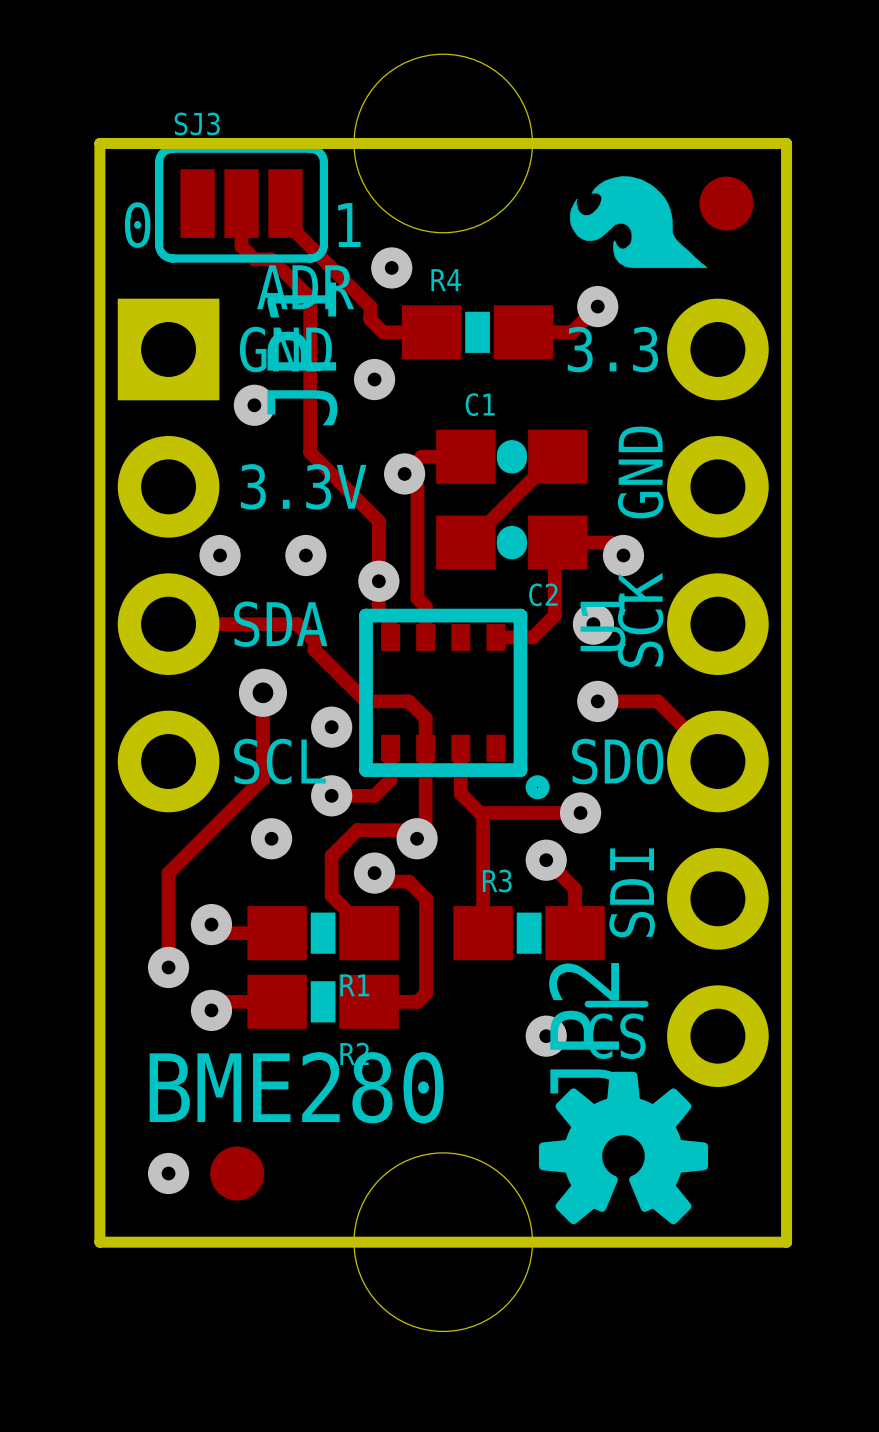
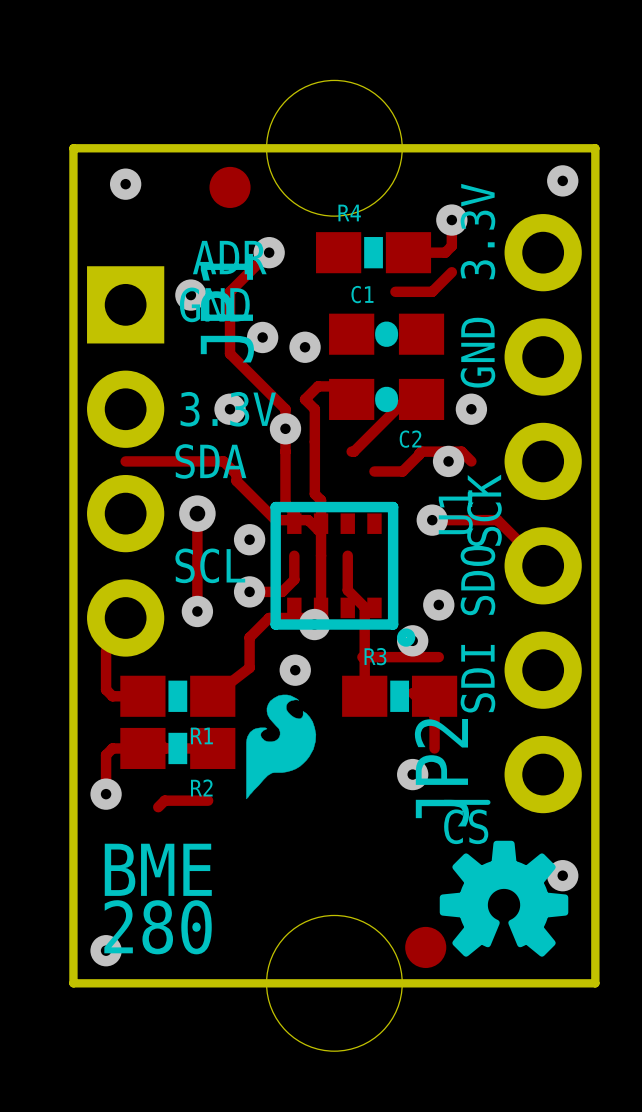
drawing: [569, 176, 708, 269] -> none
via: none -> (562, 180)
via: none -> (125, 184)
track: (241, 203) (241, 246) (254, 259) (271, 259) (310, 297) (310, 452) (378, 521) -> (269, 252) (230, 291) (230, 353) (285, 409) (285, 435)
SJ3: (241, 203) -> none
track: (285, 203) (285, 221) (370, 306) (370, 319) (383, 332) (431, 332) -> none
part position: (726, 203) -> (230, 187)
text: 0 (137, 225) -> none
text: 1 (349, 225) -> none
track: none -> (451, 220) (451, 246) (445, 252) (408, 252)
via position: (391, 267) -> (269, 252)
via position: (597, 306) -> (451, 220)
R4 position: (477, 332) -> (373, 252)
via: none -> (190, 295)
text: 3.3 (612, 349) -> 3.3V (477, 231)
via: (374, 379) -> none
via: none -> (262, 337)
via: (254, 405) -> none
via: none -> (305, 347)
C1 position: (511, 456) -> (386, 334)
text position: GND (640, 472) -> GND (477, 352)
via position: (404, 473) -> (285, 428)
via: none -> (230, 409)
via: none -> (471, 409)
C2 position: (511, 542) -> (386, 399)
track: (554, 546) (554, 615) (532, 637) (495, 637) -> (419, 454) (402, 471) (374, 471)
via: (220, 555) -> none
via: (305, 555) -> none
via position: (623, 555) -> (448, 461)
via: (378, 581) -> none
track: (168, 624) (297, 624) (314, 641) (314, 649) (365, 701) (408, 701) (425, 718) -> (125, 461) (223, 461) (236, 474) (236, 481) (275, 520) (308, 520) (321, 532) (321, 585)
text position: SDA (280, 624) -> SDA (210, 461)
via position: (593, 624) -> (432, 520)
track: none -> (432, 520) (497, 520) (543, 565)
via: none -> (249, 539)
via position: (262, 692) -> (197, 513)
JP2 position: (717, 692) -> (543, 513)
track: (597, 701) (657, 701) (717, 761) -> none
via: (597, 701) -> none
via: none -> (438, 604)
track: (390, 748) (390, 779) (374, 795) (331, 795) -> (294, 555) (294, 579) (282, 591) (249, 591)
track: (460, 748) (460, 793) (483, 816) -> (347, 555) (347, 590) (364, 607) (364, 659)
track: (262, 752) (262, 778) (168, 873) (168, 967) -> none
via: none -> (197, 611)
text position: SCL (279, 761) -> SCL (210, 565)
track: (425, 761) (425, 830) (417, 838) (408, 830) (357, 830) (331, 855) (331, 895) (369, 933) (365, 933) -> (321, 617) (314, 624) (308, 617) (269, 617) (249, 637) (249, 667) (212, 696)
text rotation: 0° (617, 761) -> 90° counterclockwise (477, 580)
via: none -> (314, 624)
via: (331, 795) -> none
track: none -> (106, 650) (106, 689) (112, 696) (142, 696)
via position: (580, 812) -> (412, 640)
via: (271, 838) -> none
via position: (417, 838) -> (295, 670)
via: (546, 860) -> none
drawing: none -> [246, 694, 317, 800]
track: (483, 864) (483, 933) -> (197, 513) (197, 565)
track: (374, 873) (383, 881) (408, 881) (426, 898) (426, 993) (417, 1001) (369, 1001) -> none
via: (374, 873) -> none
text position: SDI (632, 892) -> SDI (477, 678)
via: (211, 924) -> none
track: none -> (142, 748) (112, 748) (106, 754) (106, 794)
R1 position: (323, 933) -> (177, 696)
R3 position: (529, 933) -> (399, 696)
via position: (168, 967) -> (106, 794)
via: none -> (412, 774)
R2 position: (323, 1001) -> (177, 748)
via: (211, 1010) -> none
via: (546, 1036) -> none
text: BME280 (296, 1087) -> BME (158, 869)
via: none -> (562, 875)
drawing position: (623, 1148) -> (504, 898)
text: none -> 280 (158, 927)
via position: (168, 1173) -> (106, 950)
part position: (237, 1173) -> (425, 947)

